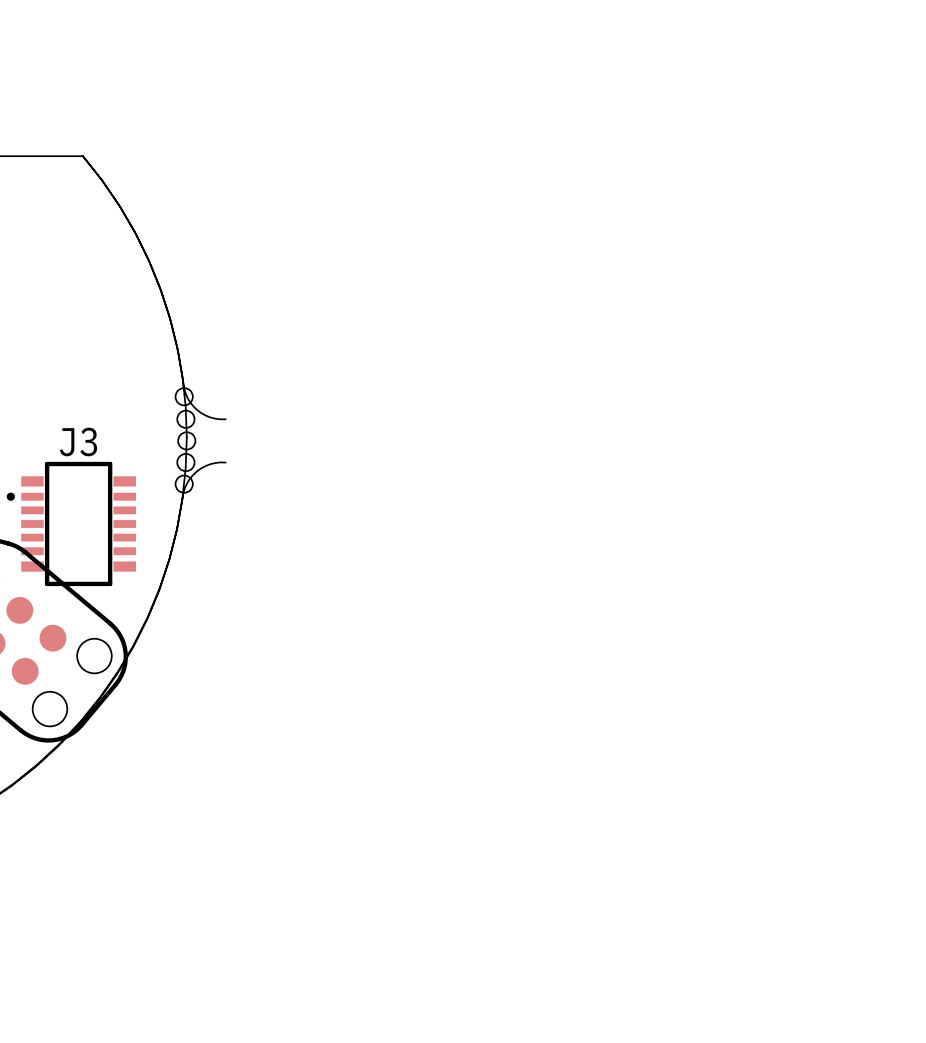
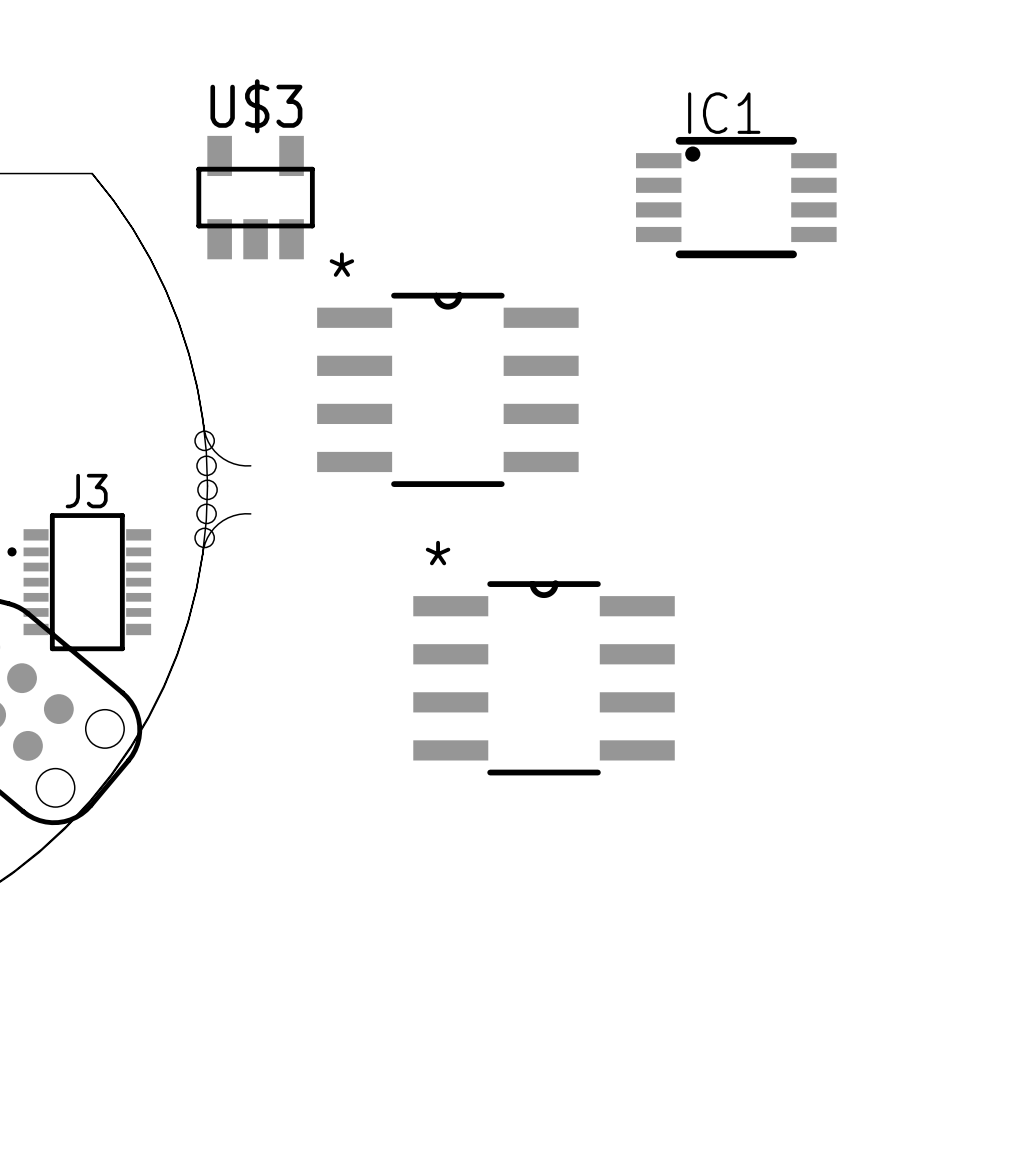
U$3: none -> (255, 197)
IC1: none -> (736, 197)
part: none -> (447, 389)
part: none -> (544, 677)

